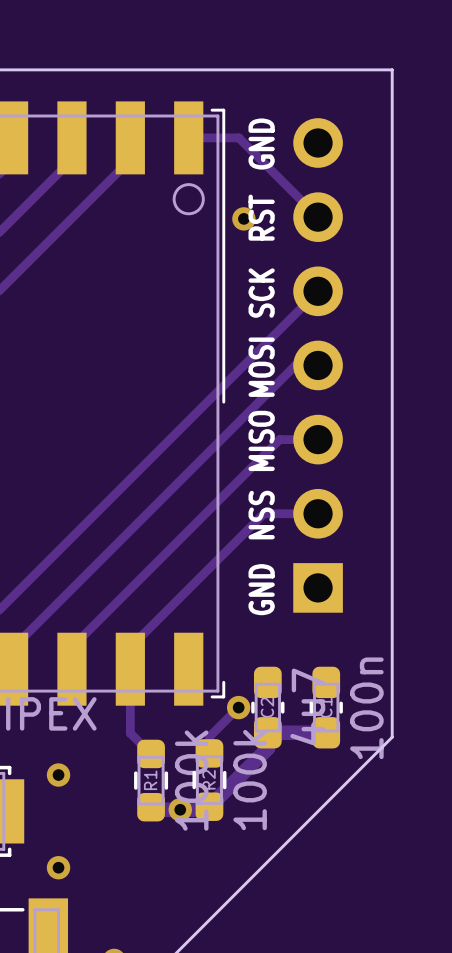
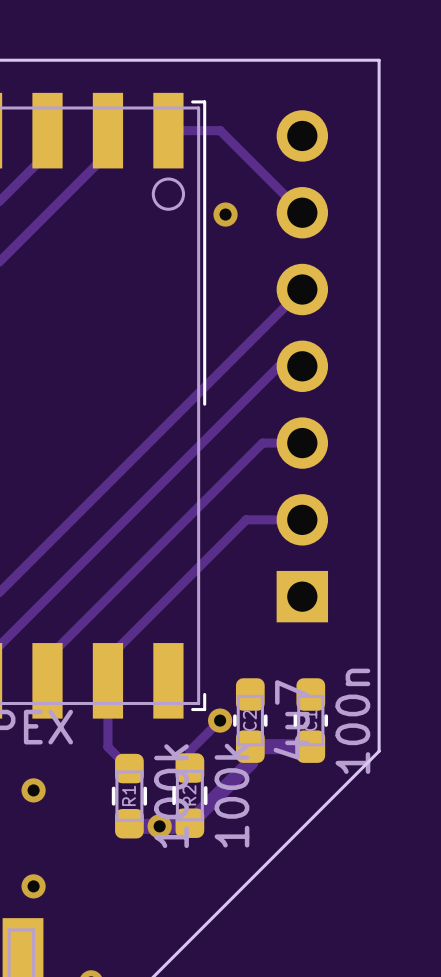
text: GND (261, 144) -> none
text: RST (261, 217) -> none
text: SCK (261, 293) -> none
text: MOSI (261, 367) -> none
text: MISO (261, 440) -> none
text: NSS (261, 515) -> none
text: GND (261, 589) -> none

